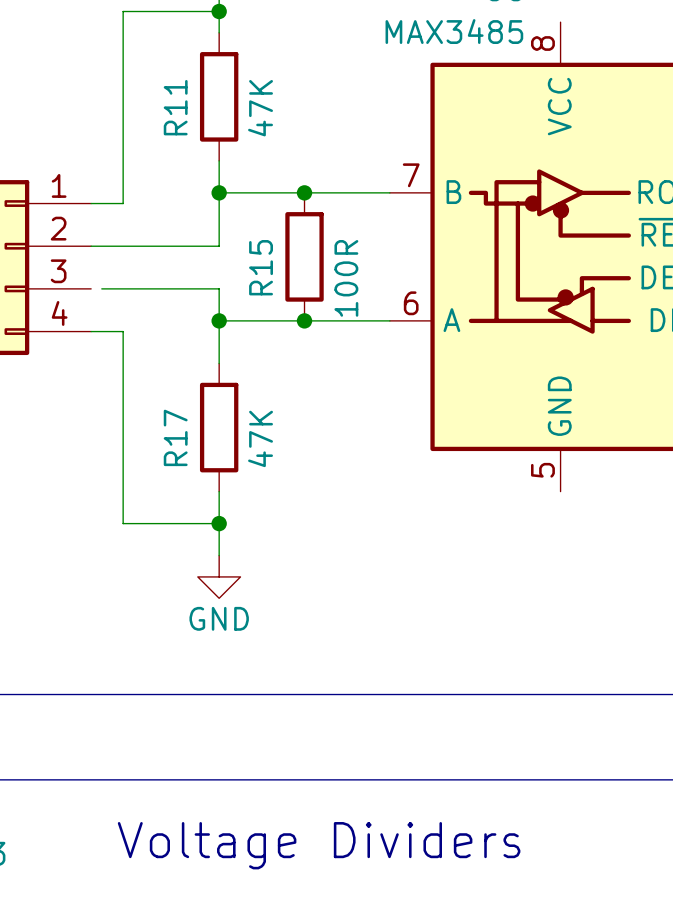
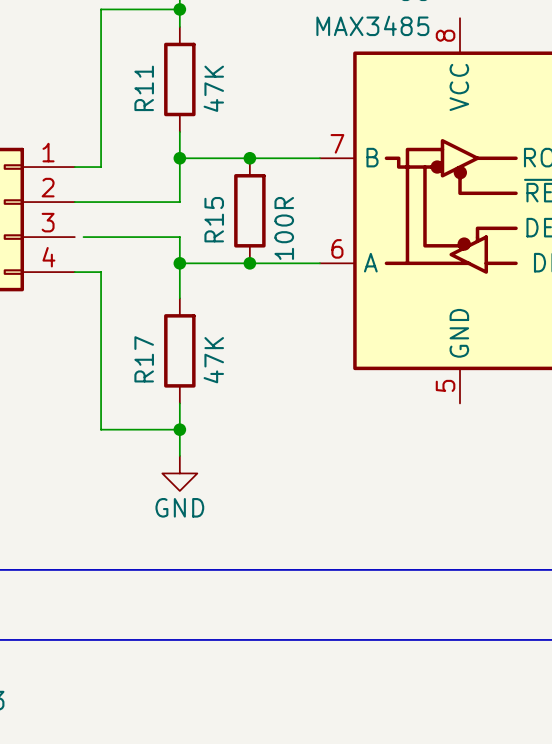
text: Voltage Dividers (319, 845) -> none

